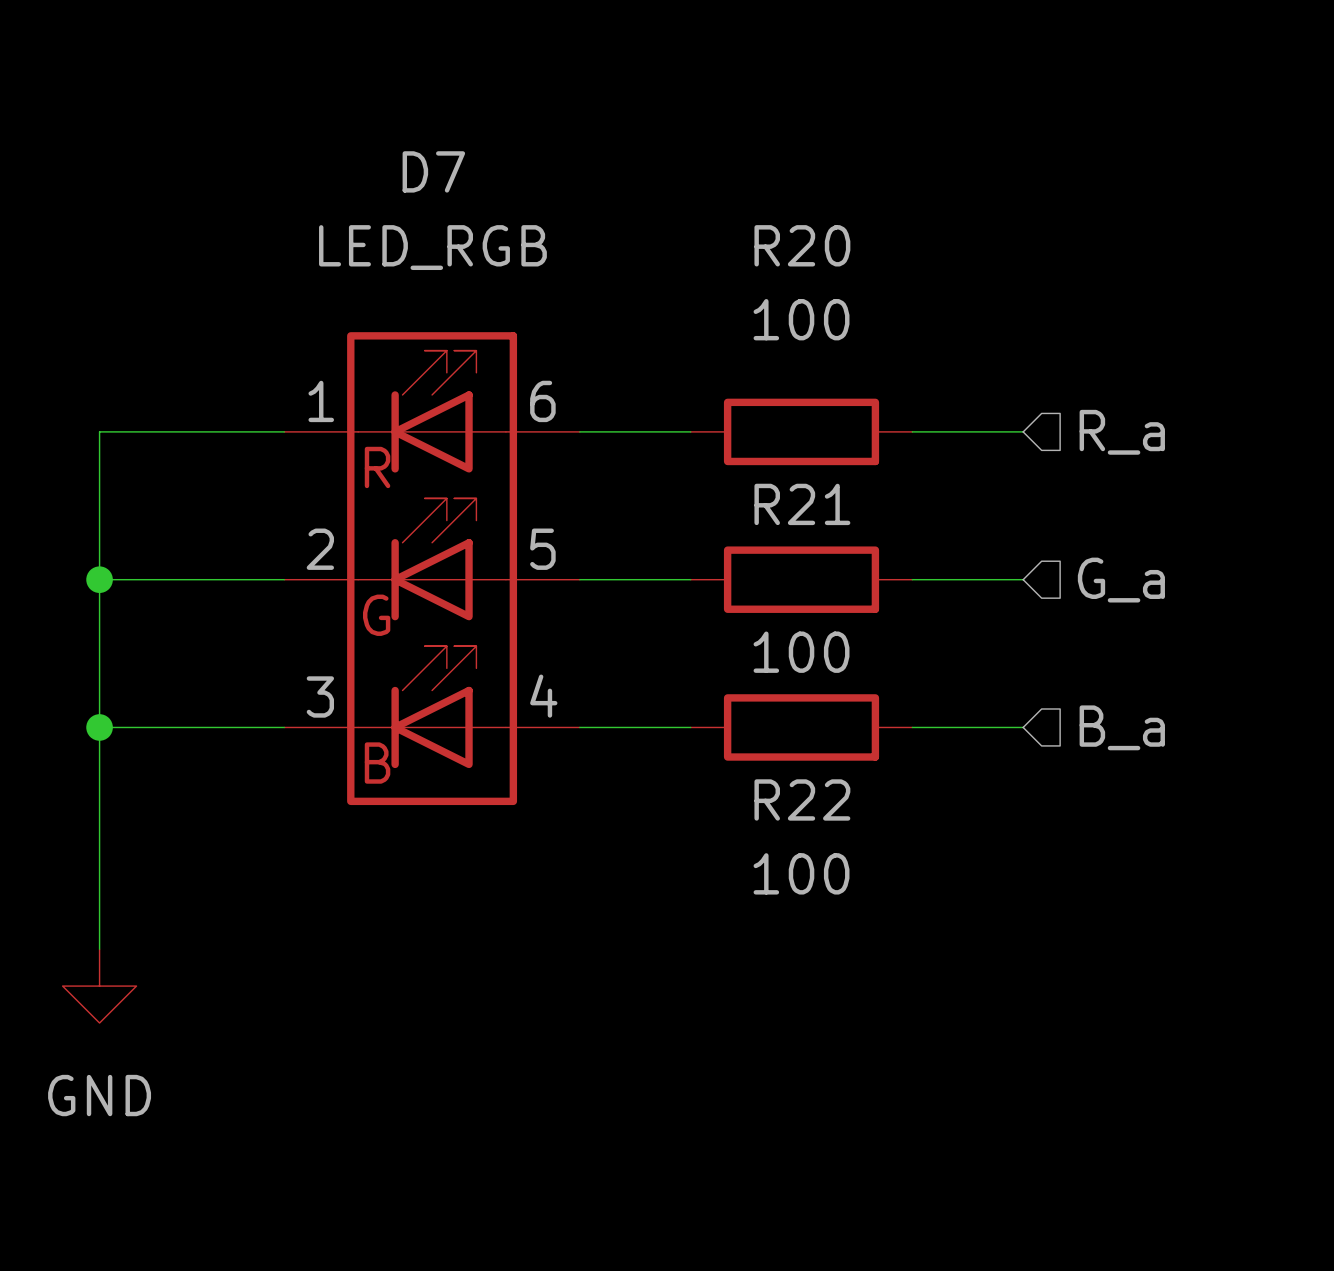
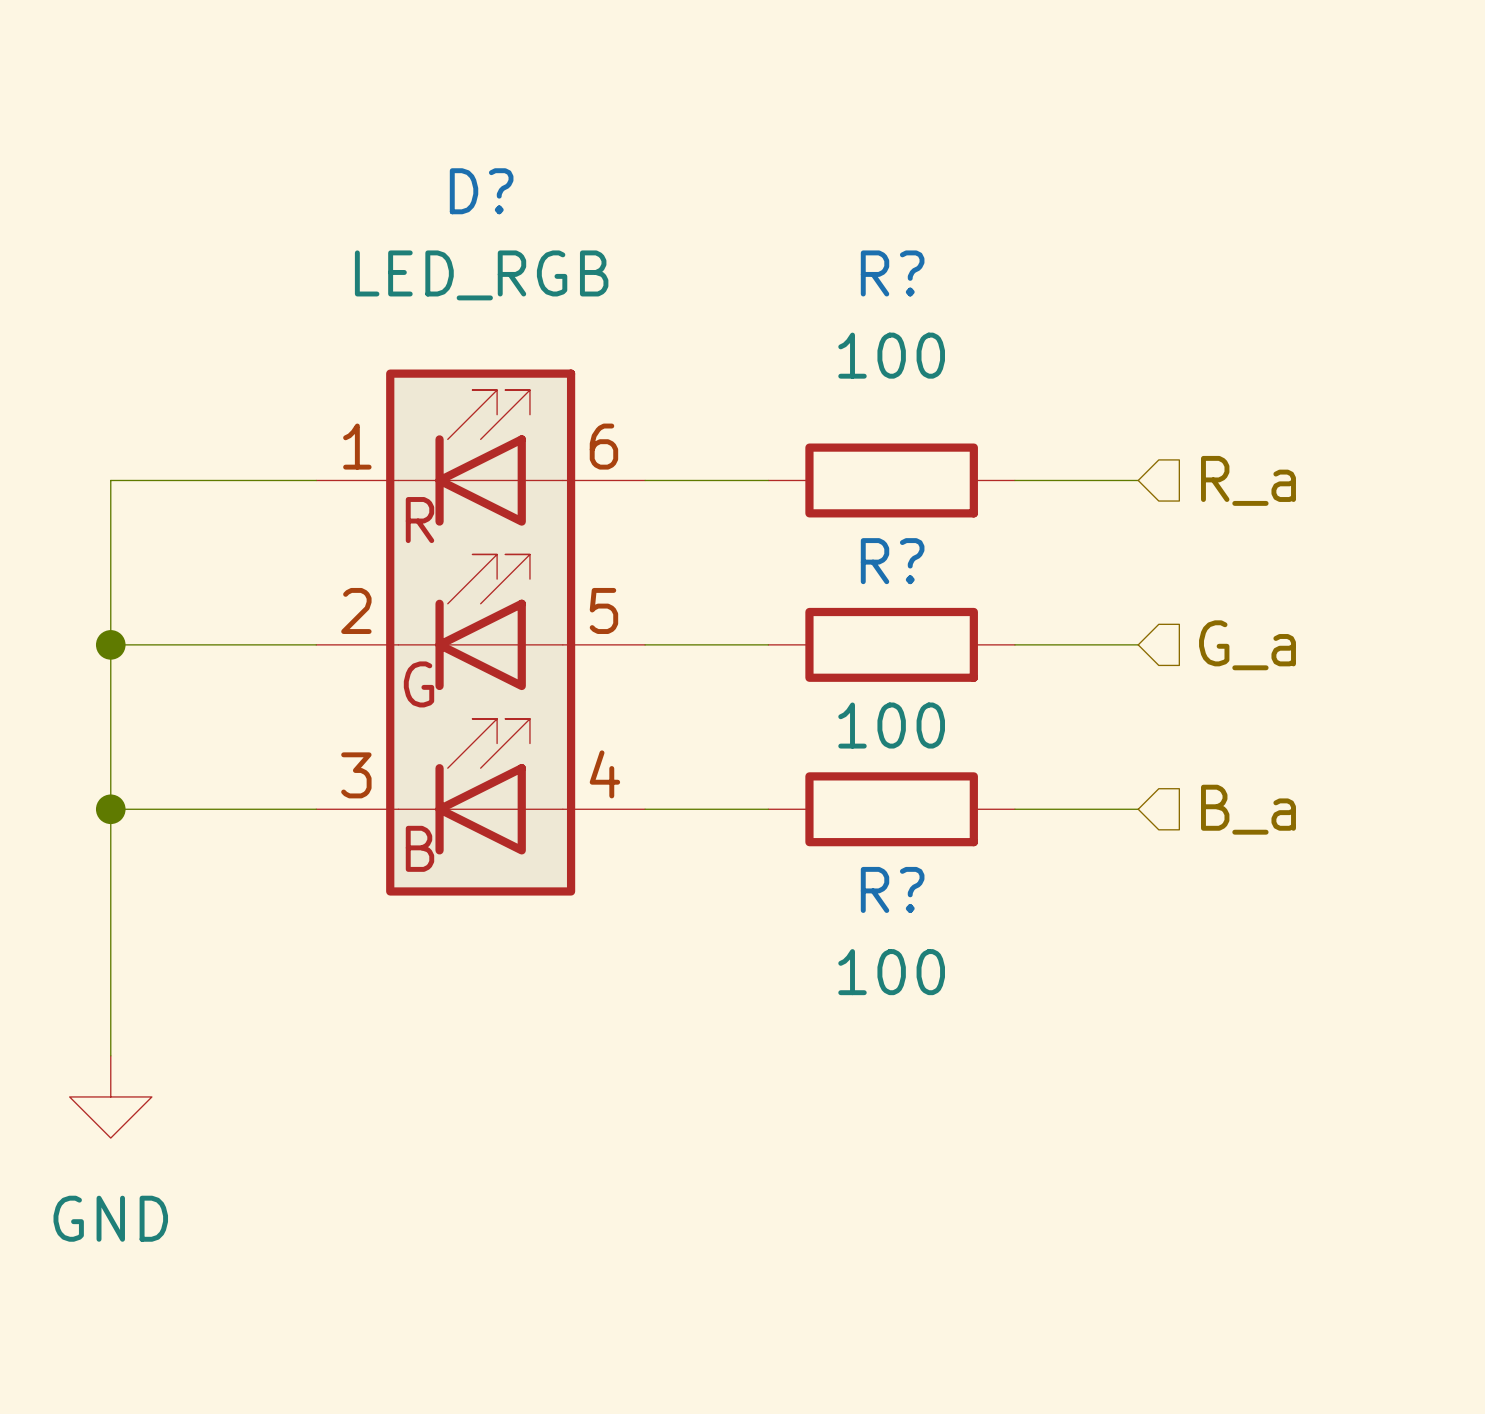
D7 name: D7 (433, 171) -> D? (481, 191)
R20 name: R20 (802, 245) -> R? (892, 273)
R21 name: R21 (802, 504) -> R? (892, 561)
R22 name: R22 (802, 799) -> R? (892, 889)

